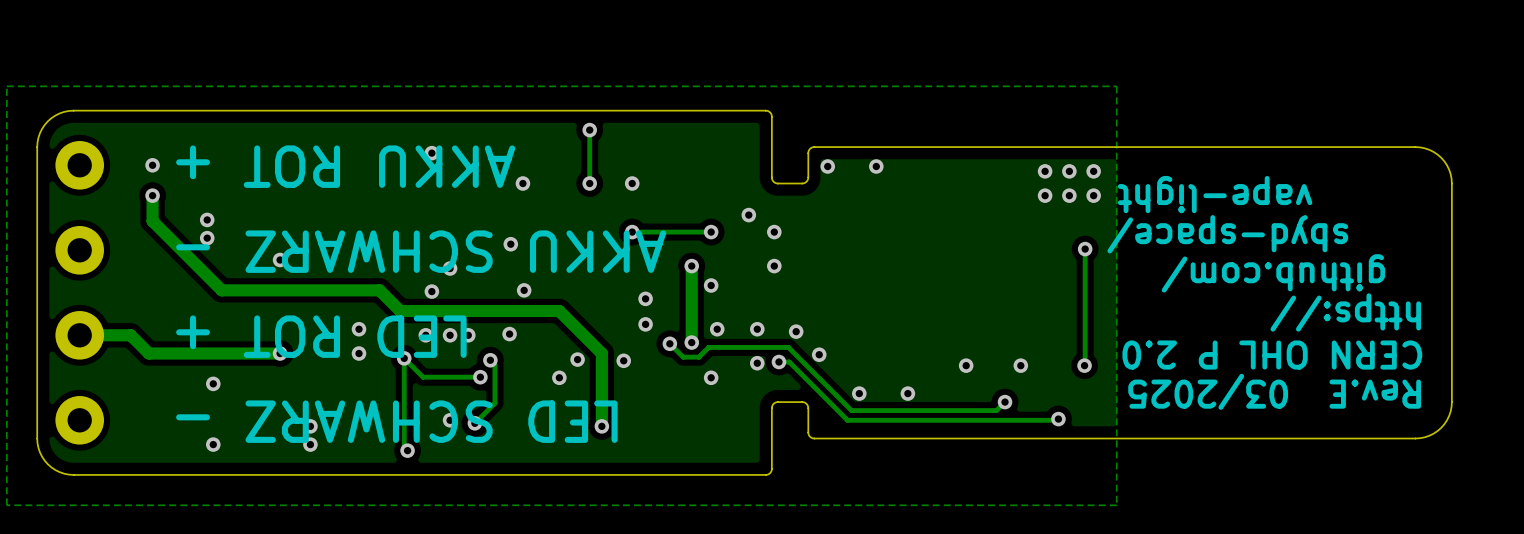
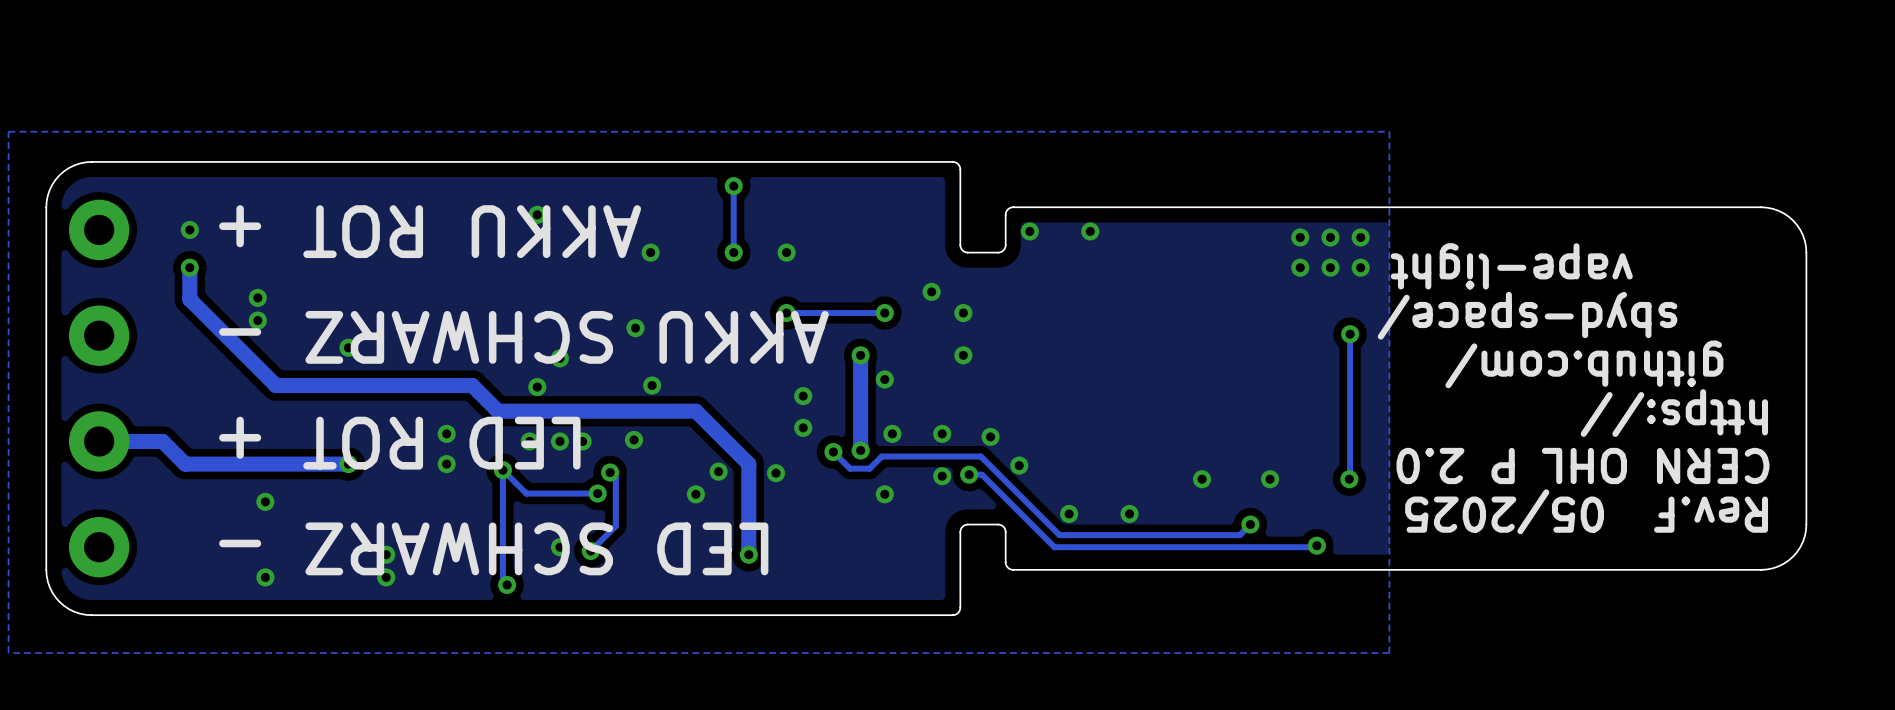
text: Rev.E 03/2025 (1274, 391) -> Rev.F 05/2025 (1586, 511)

